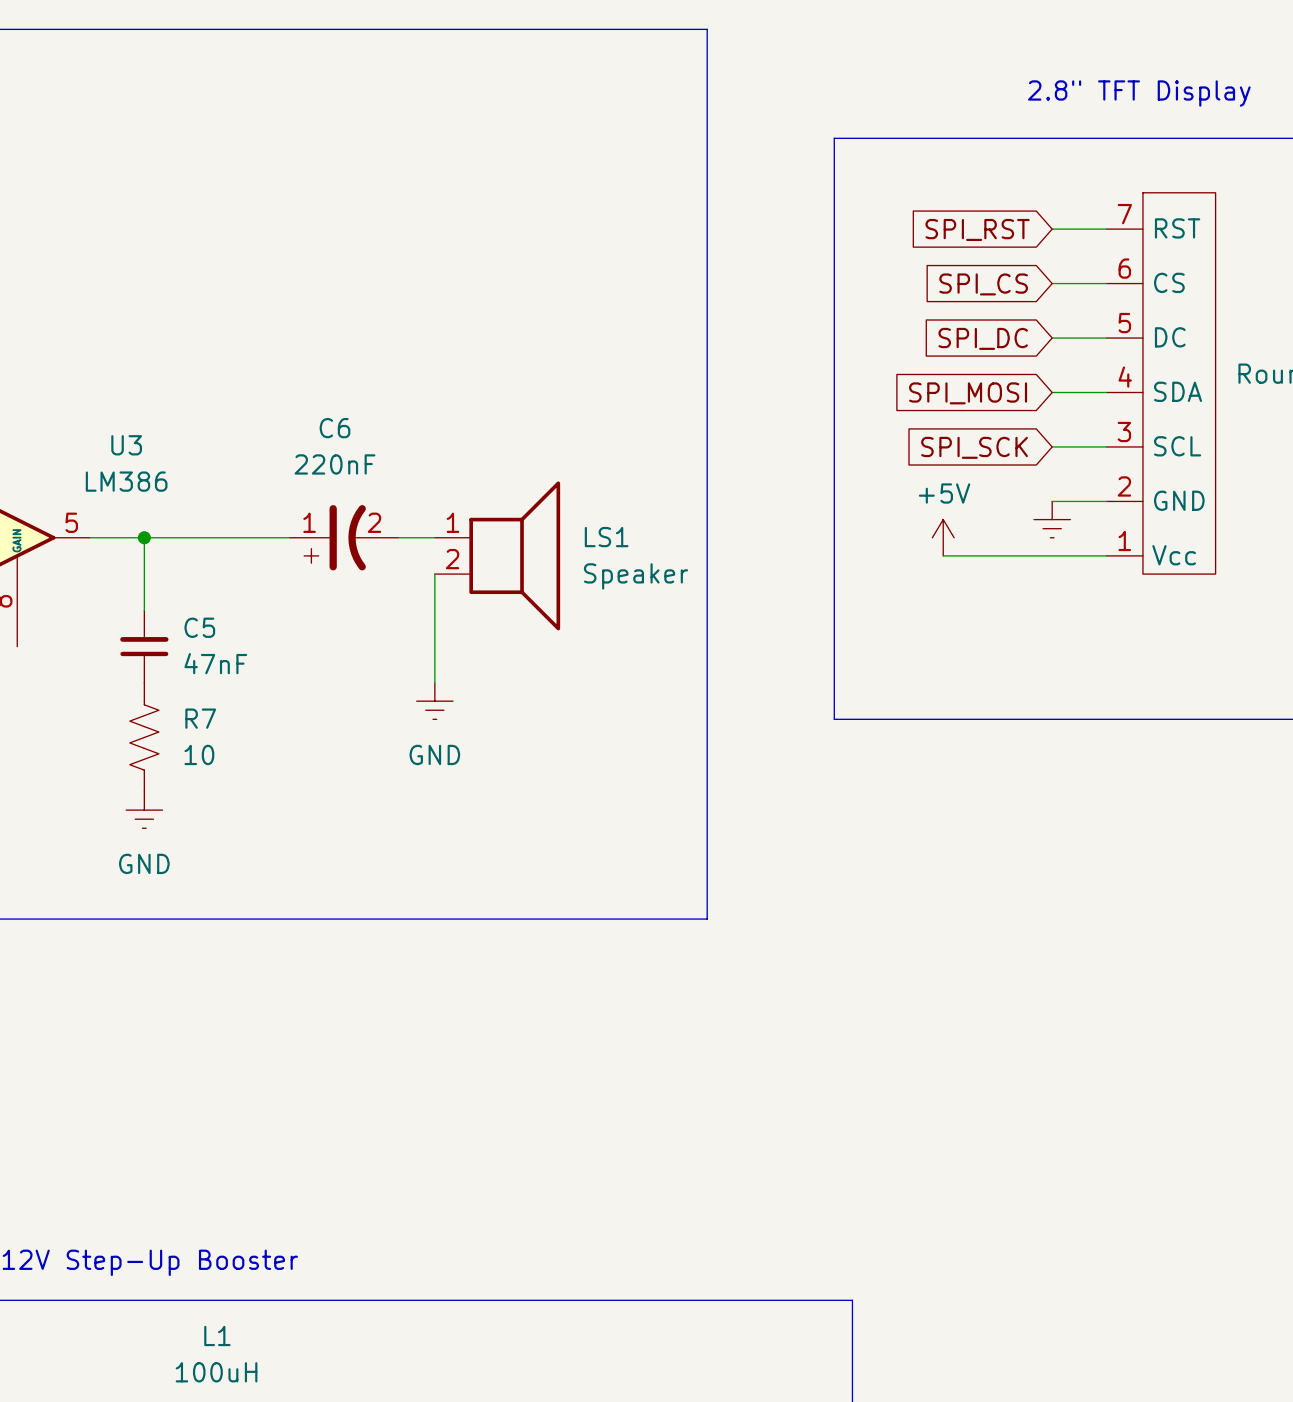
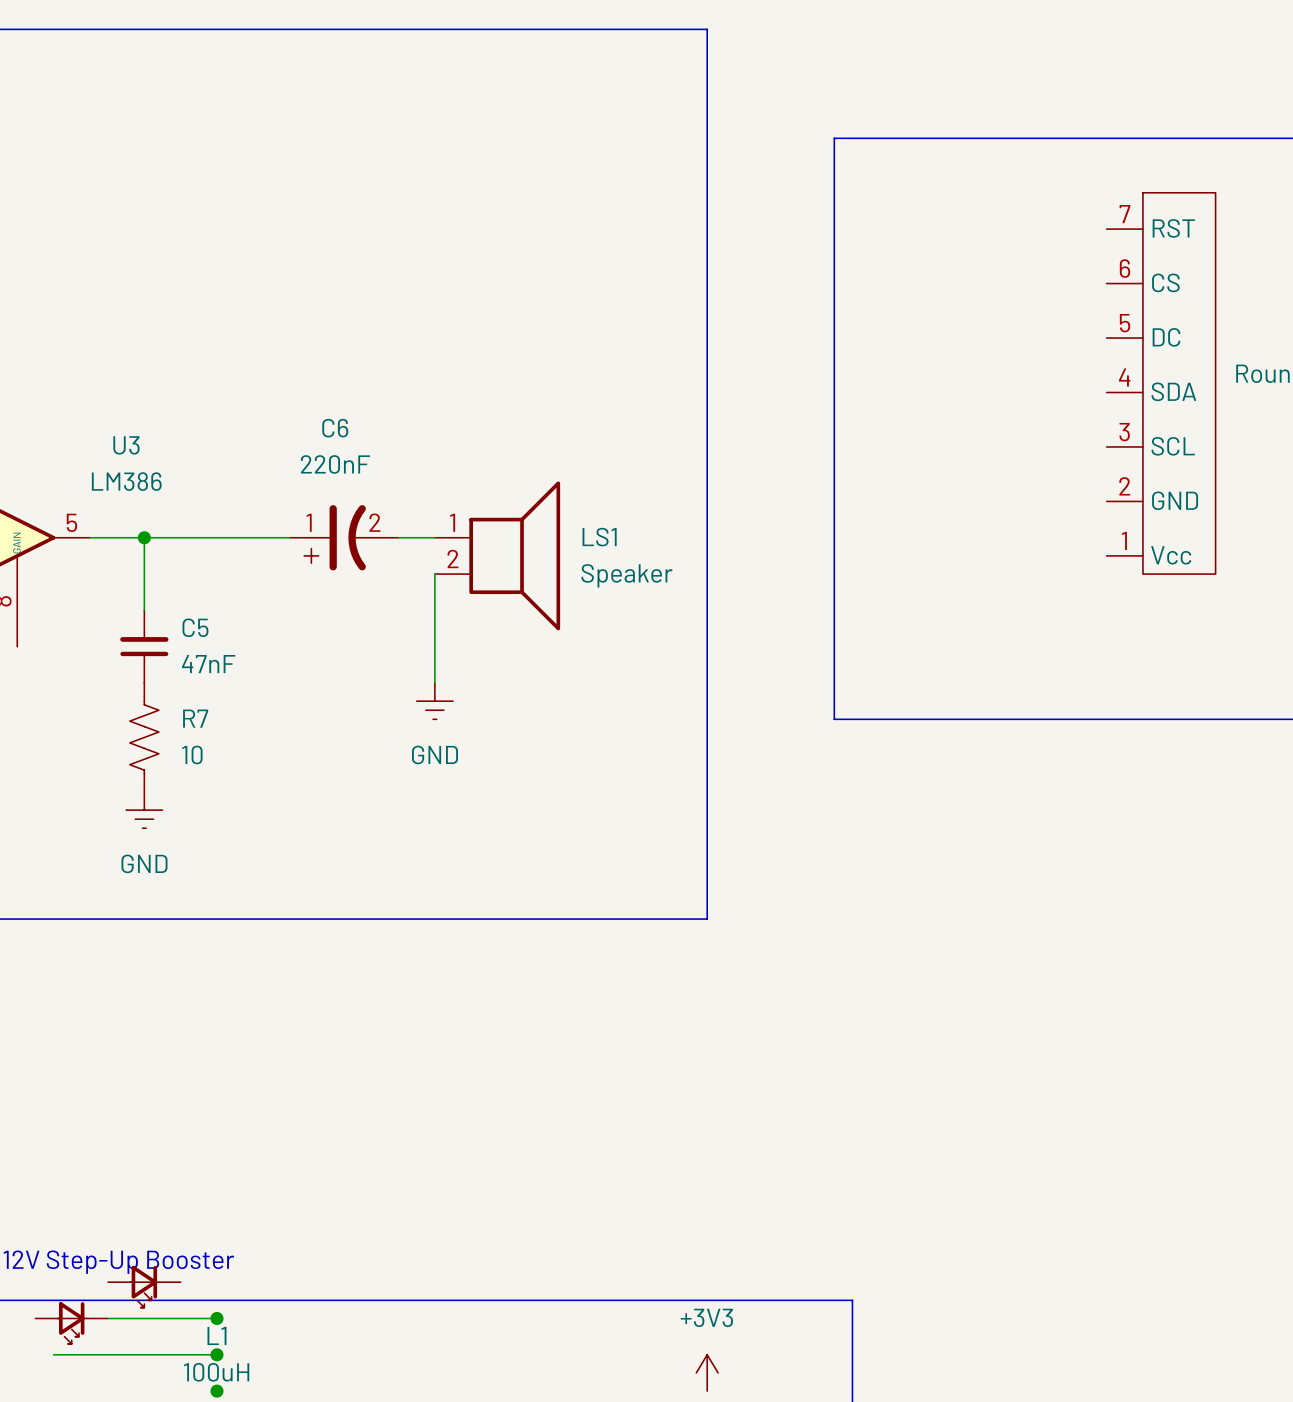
text: 2.8" TFT Display (1139, 93) -> none
global label: SPI_RST (977, 229) -> none
wire: (1052, 229) (1106, 229) -> none
wire: (1052, 283) (1106, 283) -> none
global label: SPI_CS (983, 284) -> none
global label: SPI_DC (983, 338) -> none
wire: (1052, 338) (1106, 338) -> none
wire: (1052, 392) (1106, 392) -> none
global label: SPI_MOSI (968, 393) -> none
wire: (1052, 446) (1106, 446) -> none
global label: SPI_SCK (974, 447) -> none
wire: (1052, 501) (1106, 501) -> none
power symbol: (1052, 519) -> none
power symbol: +5V (943, 537) -> none
wire: (943, 555) (1106, 555) -> none
part: none -> (144, 1286)
wire: none -> (108, 1318) (216, 1318)
junction: none -> (216, 1318)
part: none -> (71, 1323)
wire: none -> (53, 1354) (216, 1354)
junction: none -> (216, 1354)
power symbol: none -> +3V3 (707, 1372)
junction: none -> (216, 1391)

